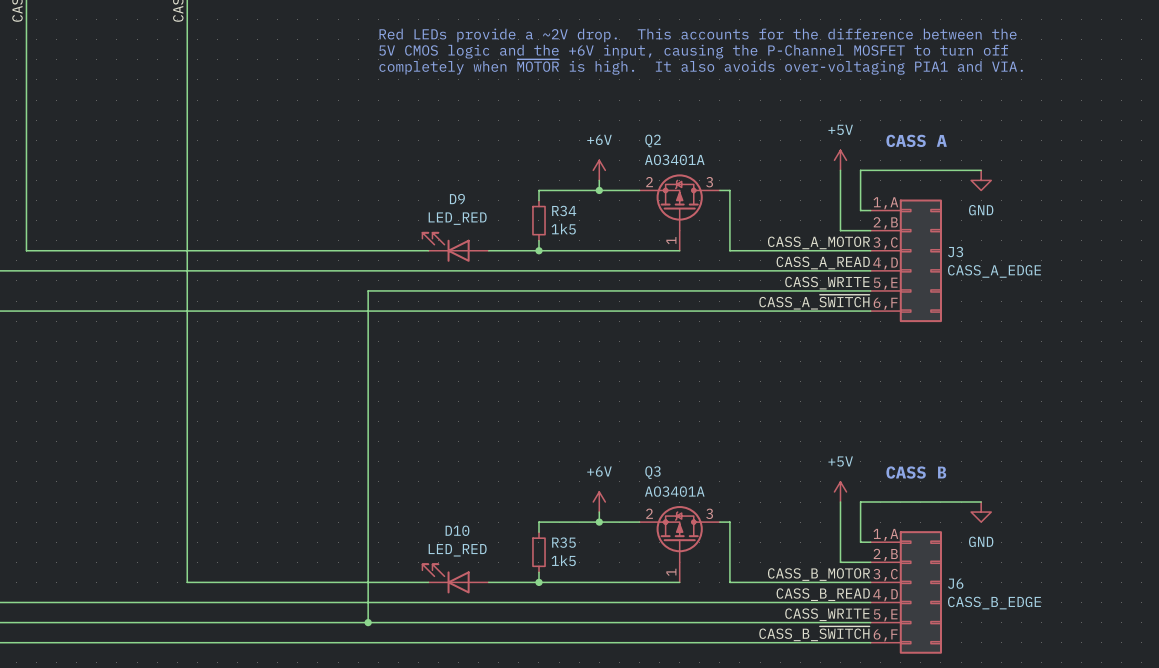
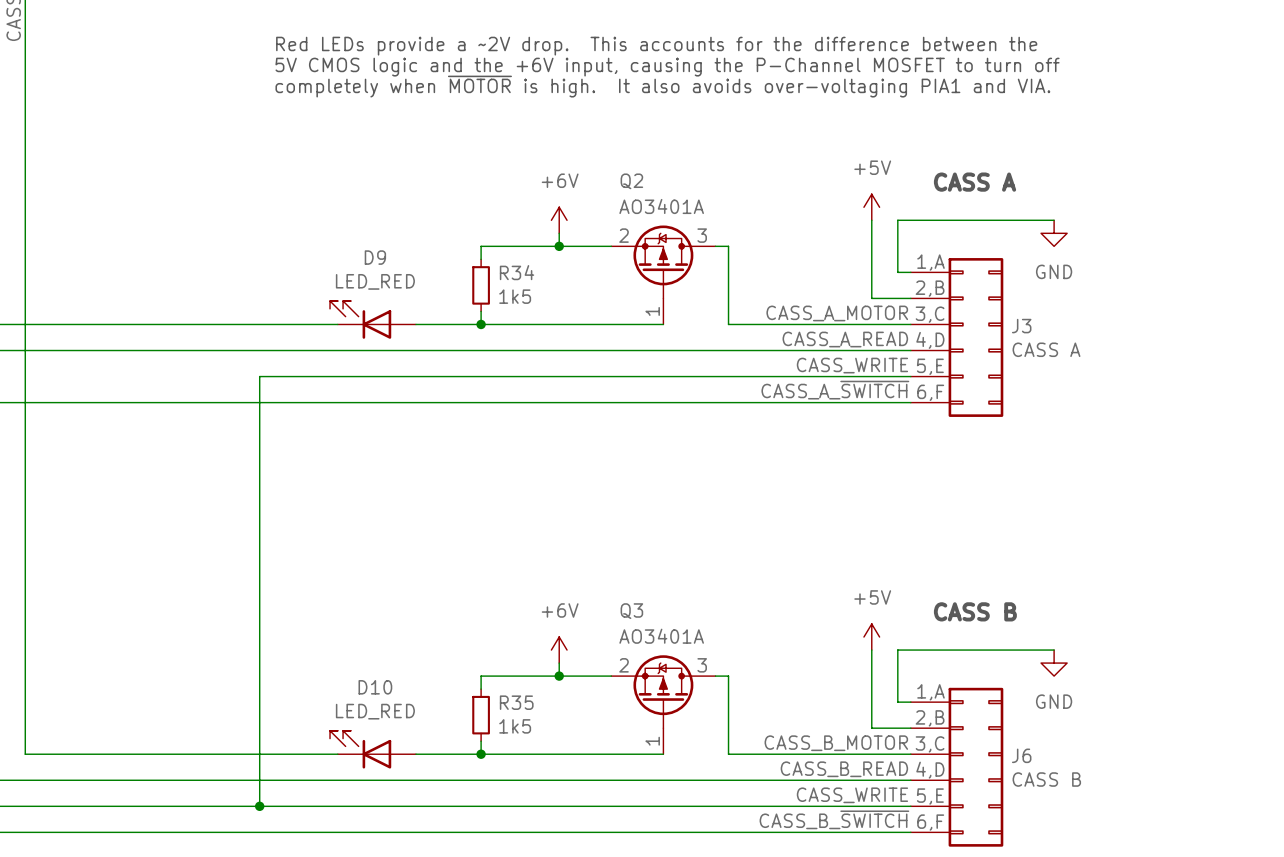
J3 value: CASS_A_EDGE (994, 271) -> CASS A (1046, 349)
J6 value: CASS_B_EDGE (994, 603) -> CASS B (1046, 779)

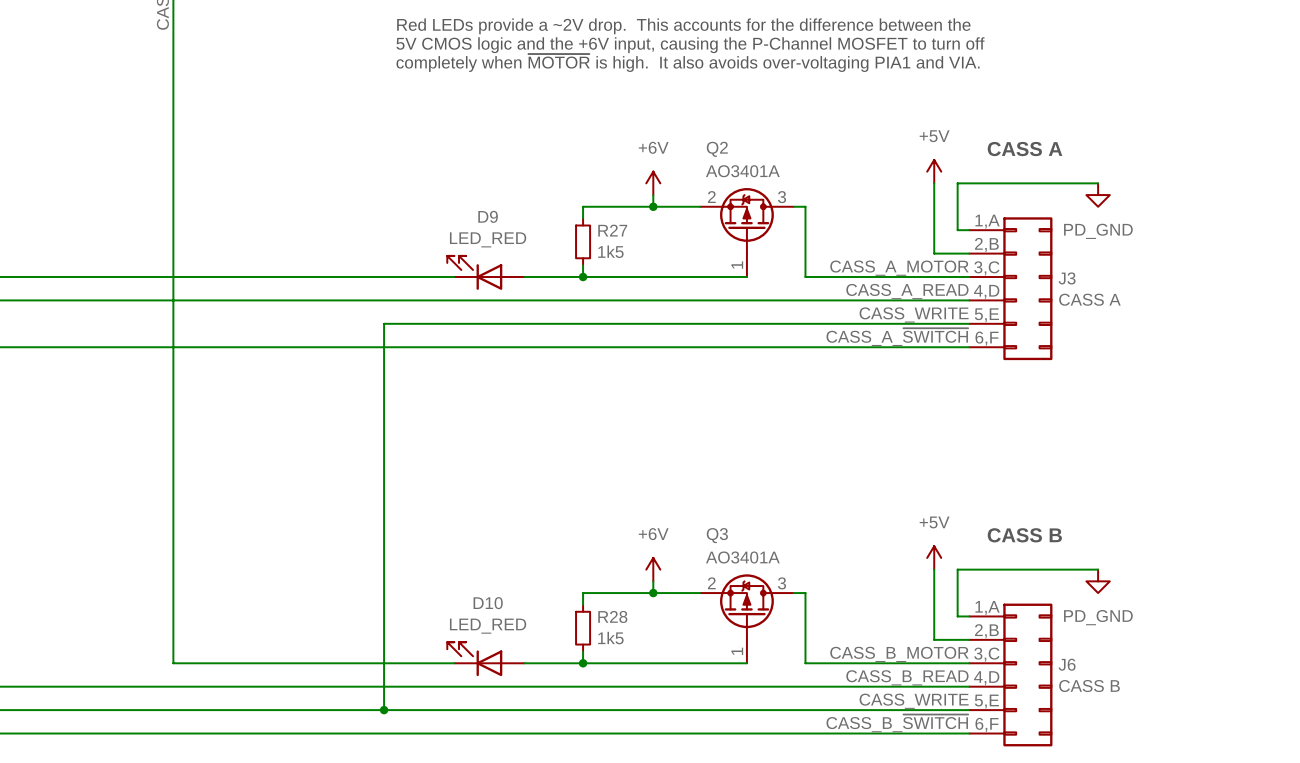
power symbol: GND (1054, 233) -> PD_GND (1098, 195)
R34 name: R34 (517, 272) -> R27 (612, 230)
power symbol: GND (1054, 663) -> PD_GND (1098, 581)
R35 name: R35 (516, 702) -> R28 (612, 616)

